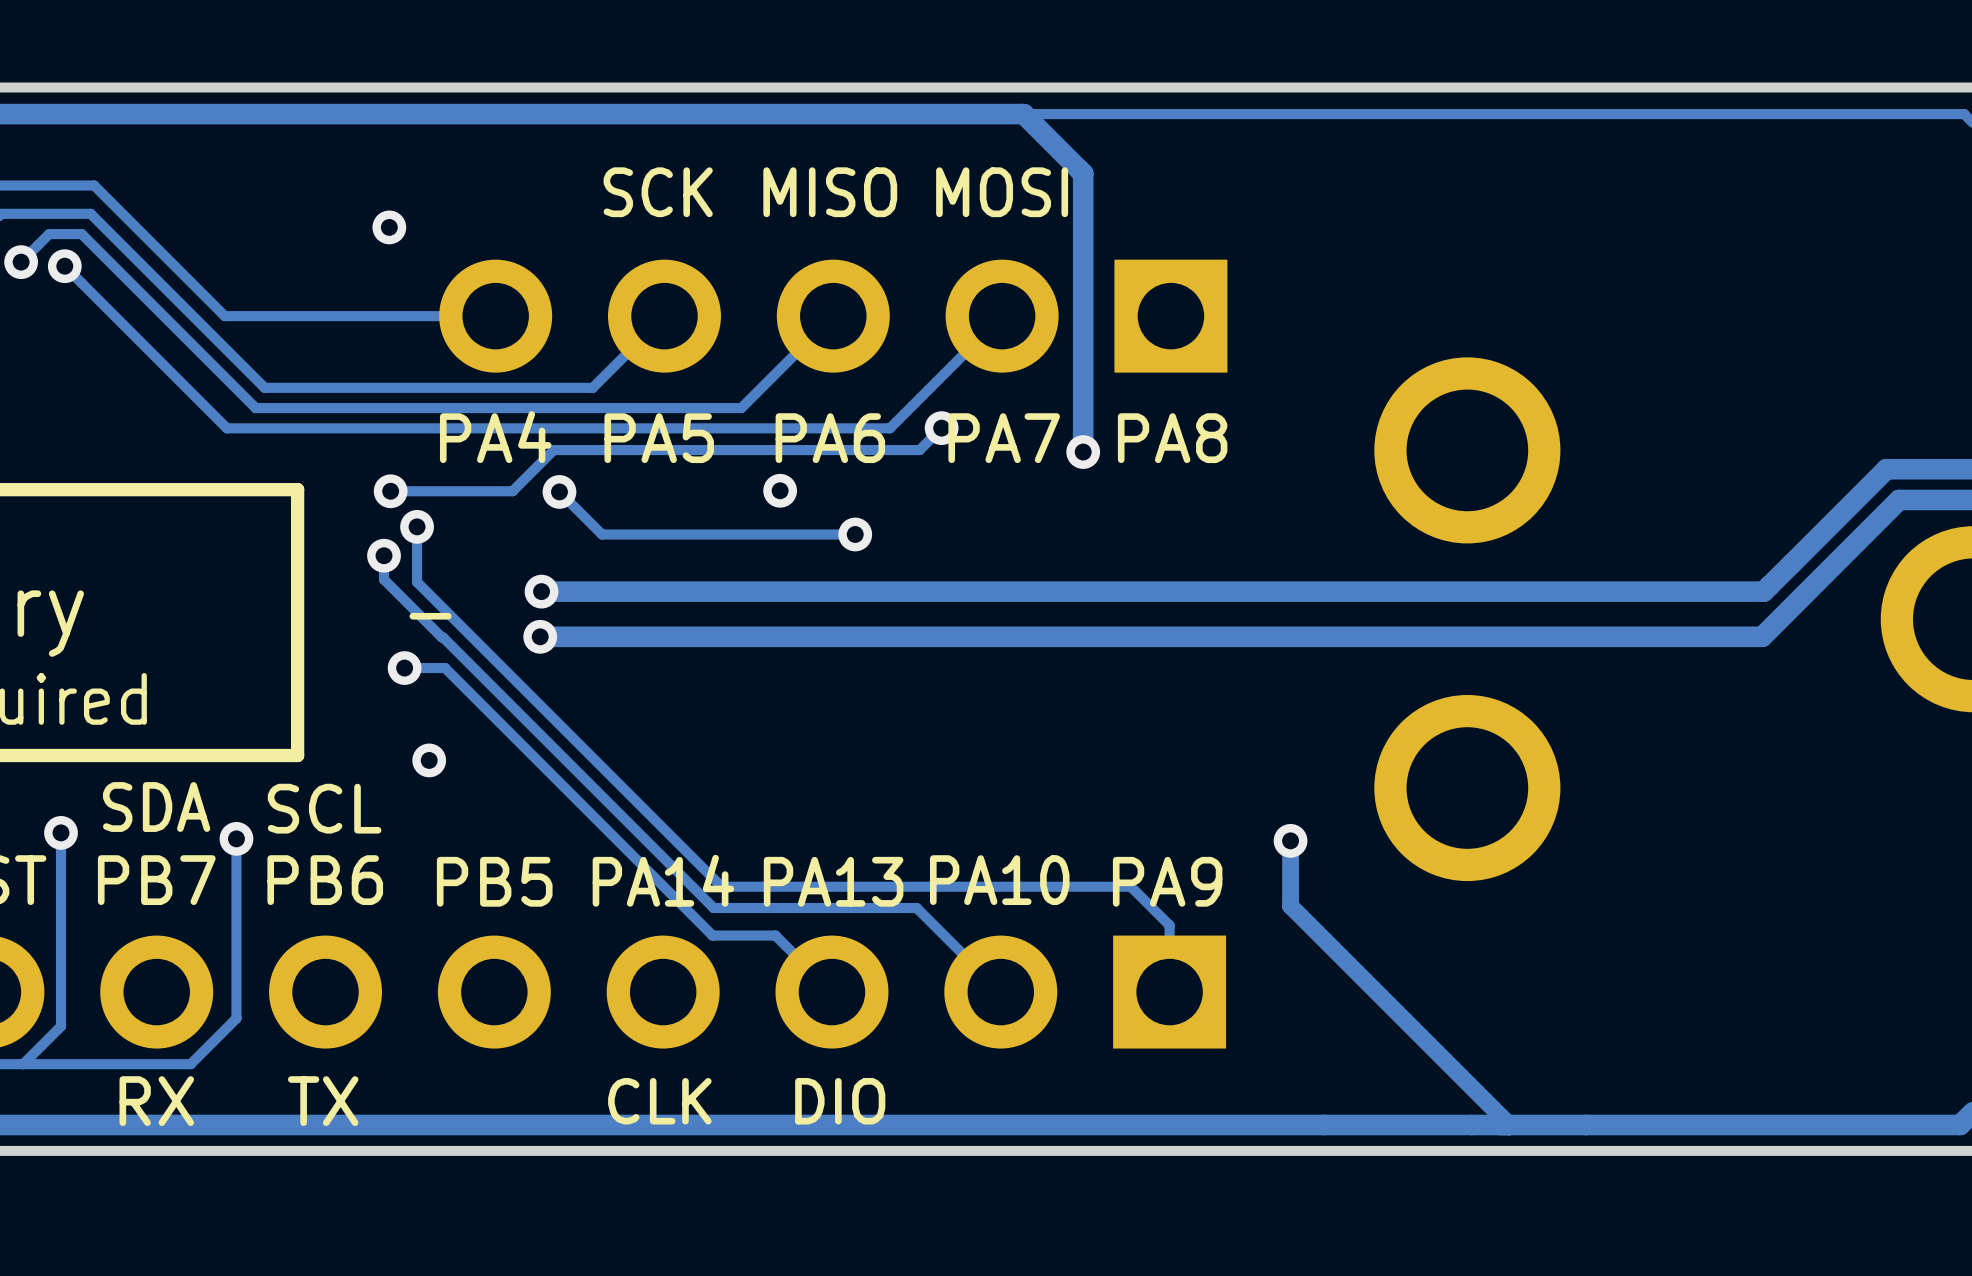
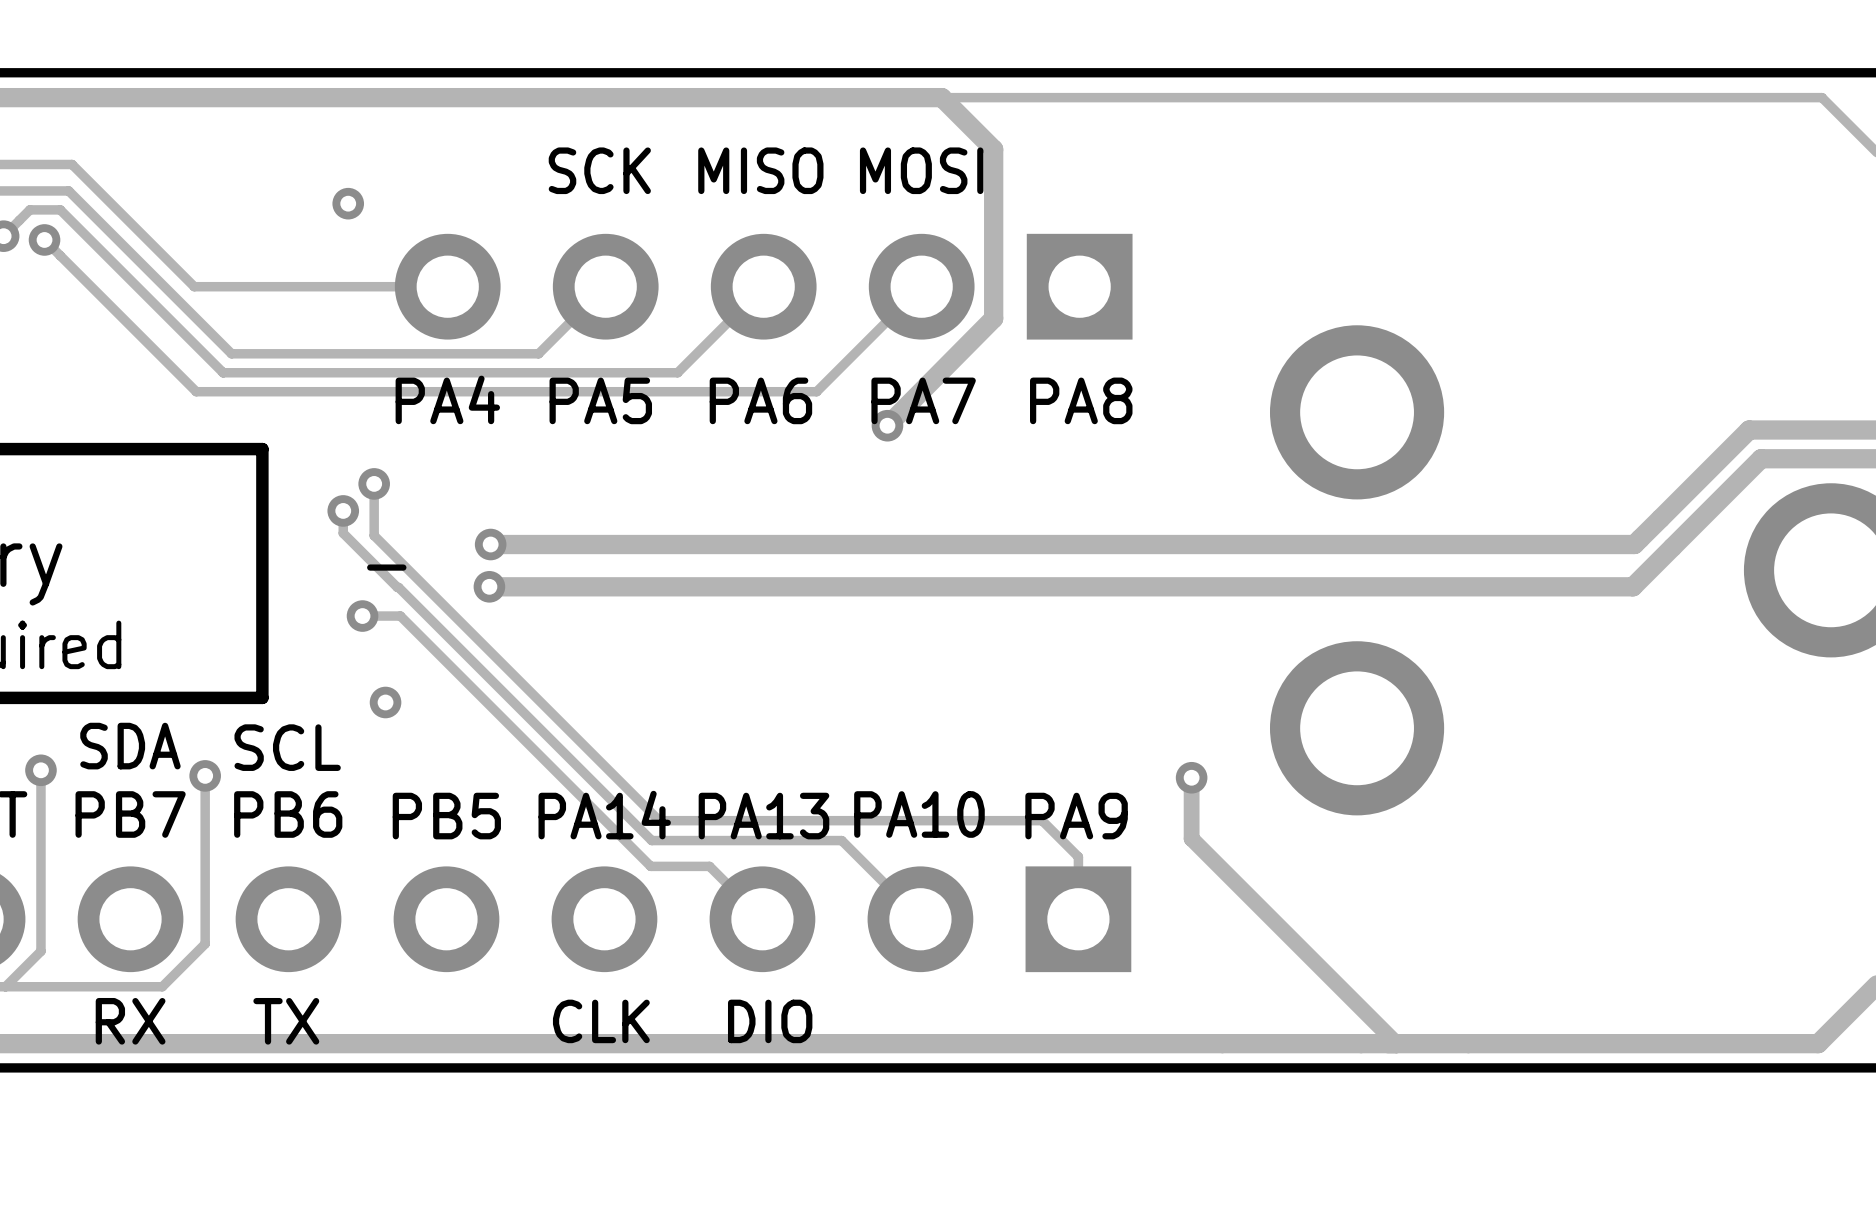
track: (1079, 169) (1083, 173) (1083, 452) -> (993, 149) (993, 318) (887, 425)
track: (941, 428) (919, 450) (553, 450) (512, 491) (390, 491) -> none
via position: (941, 428) -> (887, 425)
via: (1083, 452) -> none
via: (780, 490) -> none
via: (390, 491) -> none
track: (559, 491) (602, 534) (855, 534) -> none
via: (559, 491) -> none
via: (855, 534) -> none

